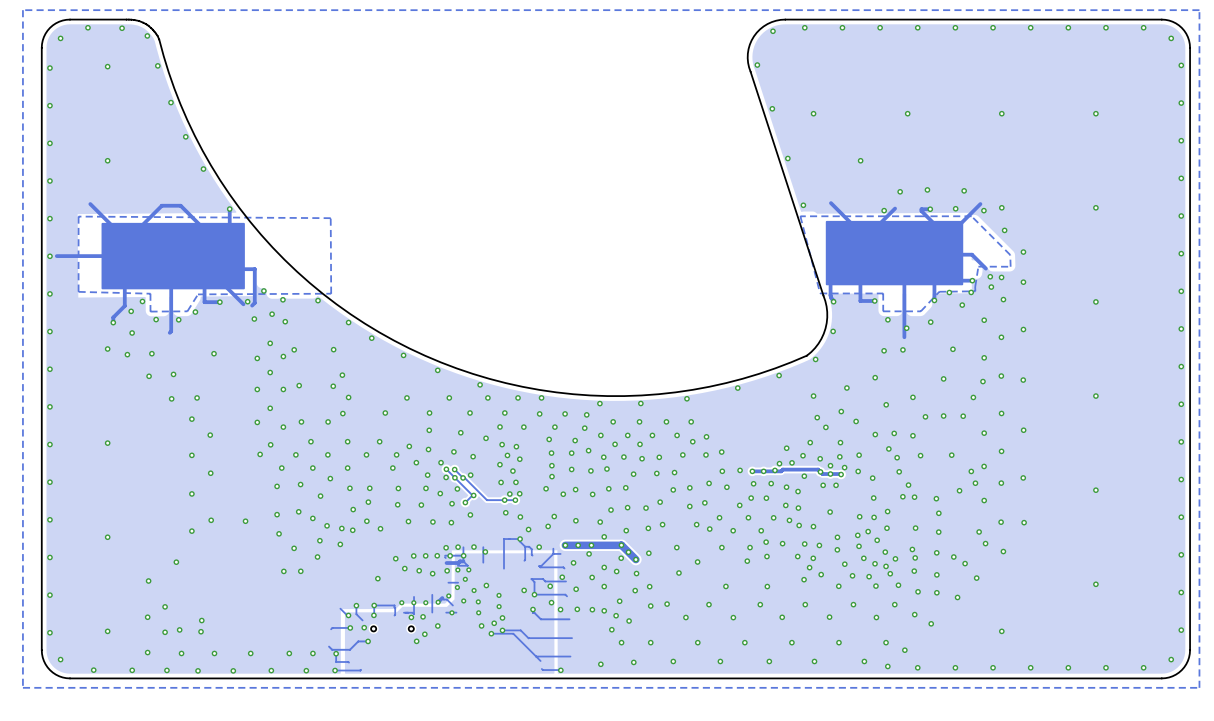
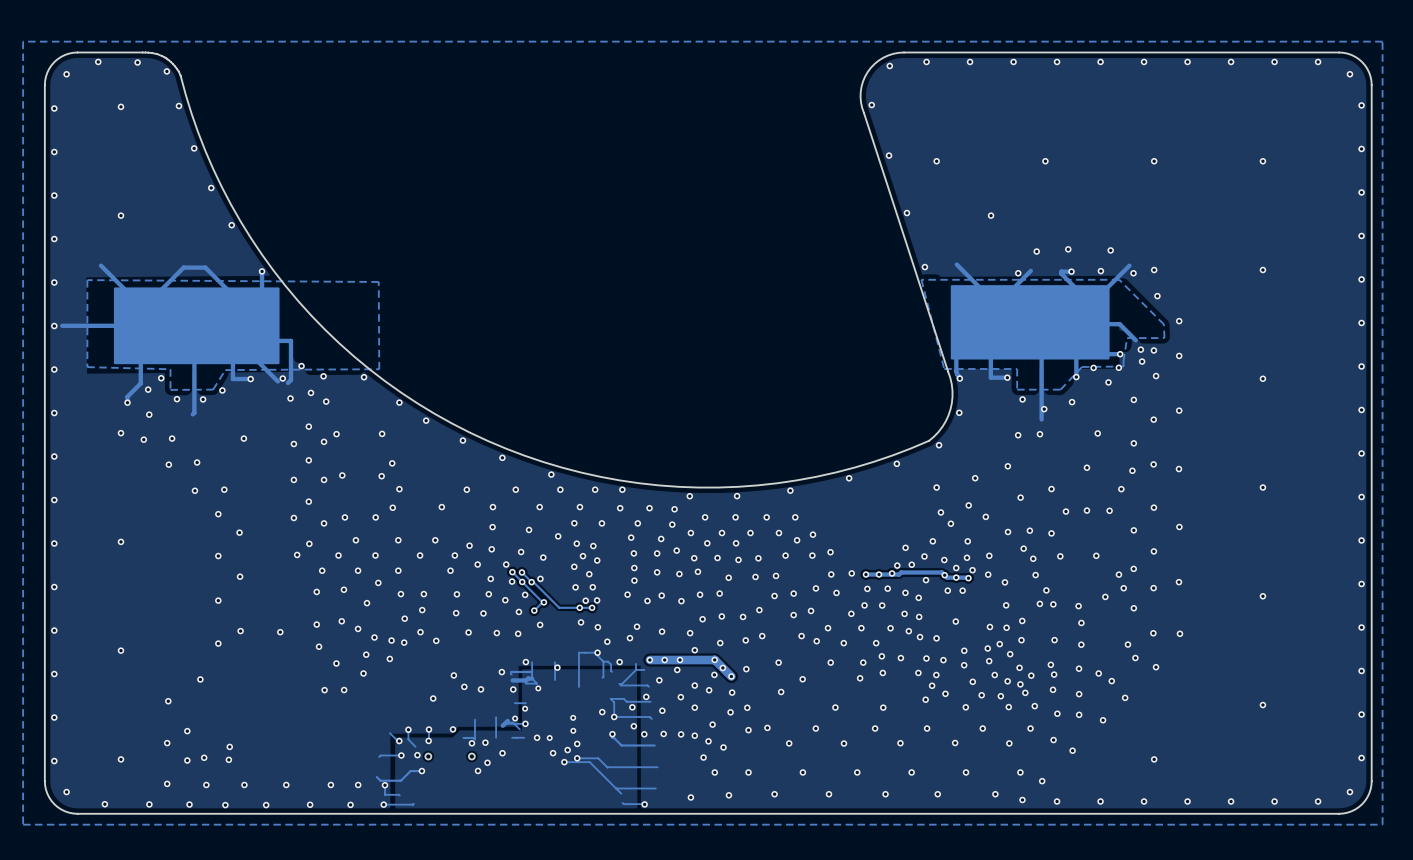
via: (446, 547) -> none
via: (473, 547) -> none
via: (413, 555) -> none
via: (425, 555) -> none
via: (450, 555) -> none
via: (463, 555) -> none
via: (457, 569) -> none
via: (432, 573) -> none
via: (465, 579) -> none
via: (486, 585) -> none
via: (474, 590) -> none
track: none -> (525, 723) (502, 723)
via: none -> (525, 723)
via: (463, 600) -> none
via: (478, 601) -> none
via: (401, 602) -> none
via: (413, 602) -> none
via: (425, 602) -> none
via: (438, 602) -> none
track: (374, 605) (394, 605) (394, 615) -> none
via: none -> (453, 729)
via: (451, 612) -> none
via: none -> (537, 737)

